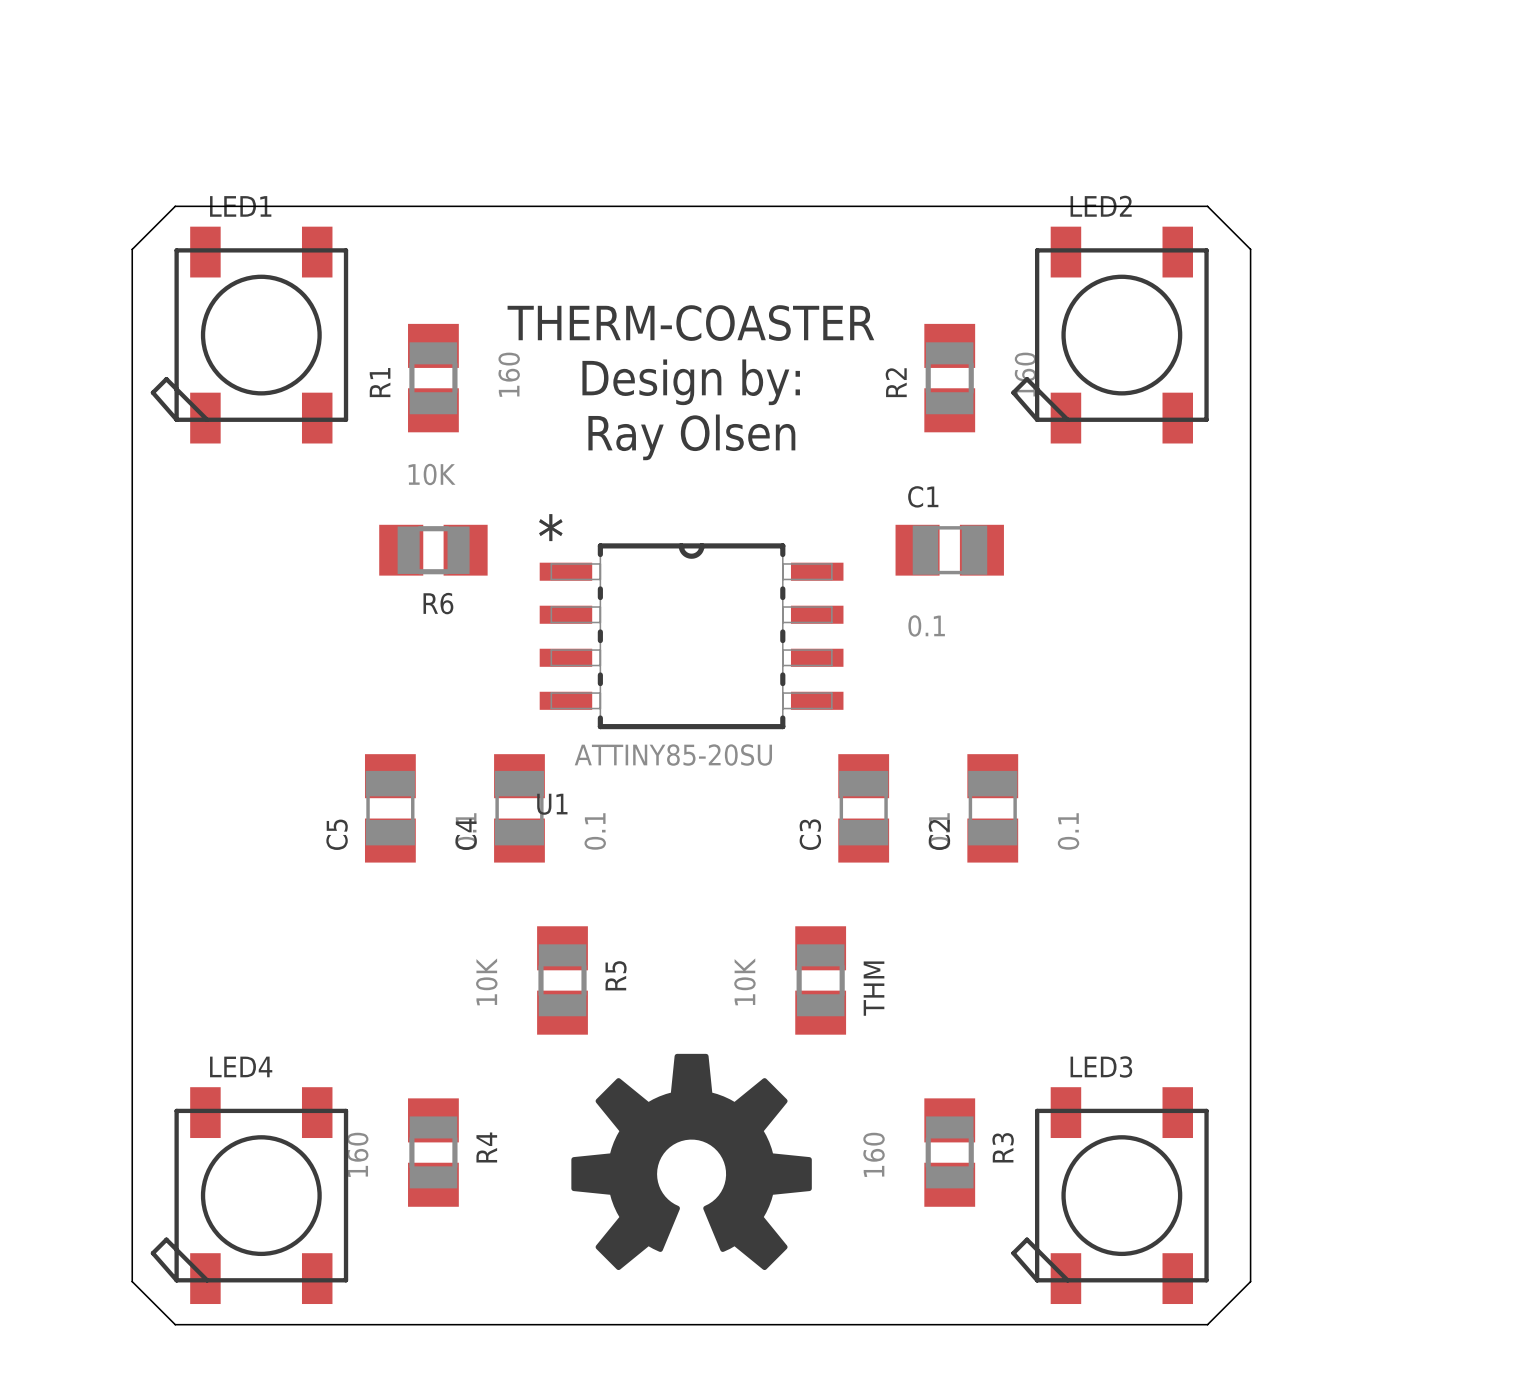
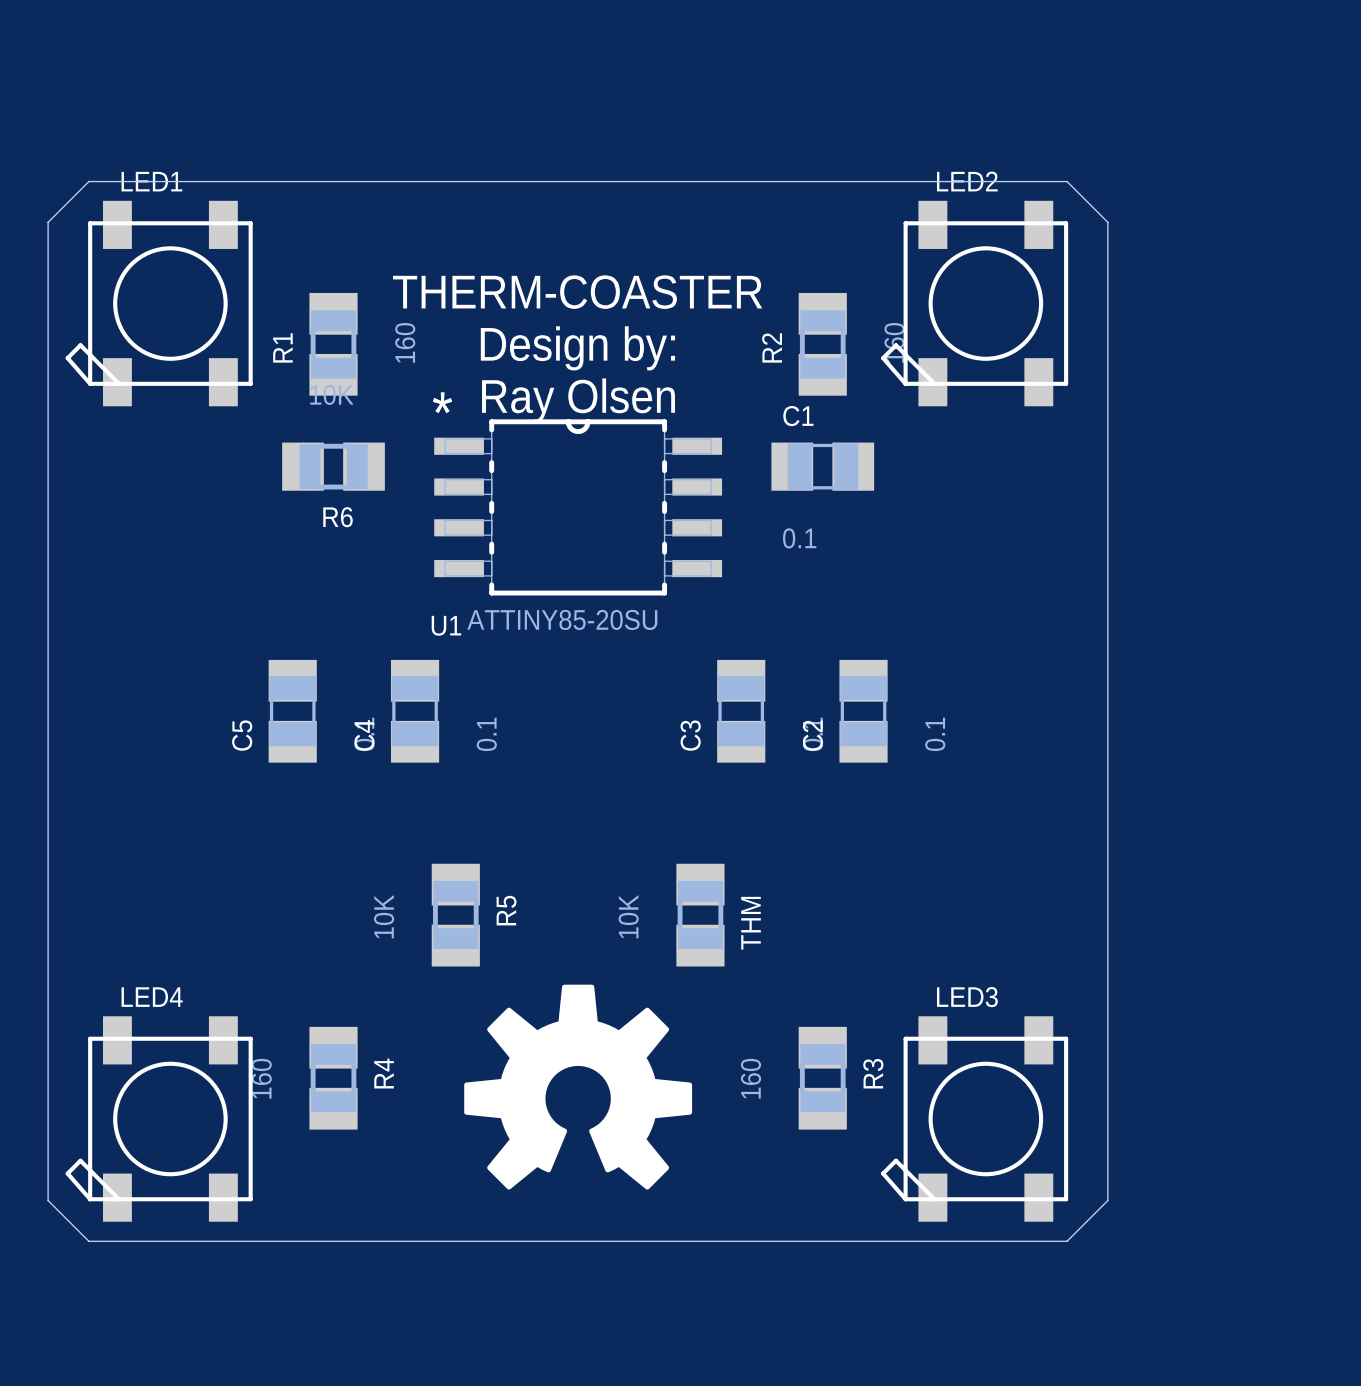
R6 position: (433, 550) -> (333, 466)
C1 position: (949, 550) -> (822, 466)
U1 position: (691, 636) -> (578, 507)
U1 name position: U1 (552, 804) -> U1 (446, 625)
C5 position: (390, 808) -> (292, 711)
C4 position: (519, 808) -> (415, 711)
C3 position: (863, 808) -> (741, 711)
C2 position: (992, 808) -> (863, 711)

